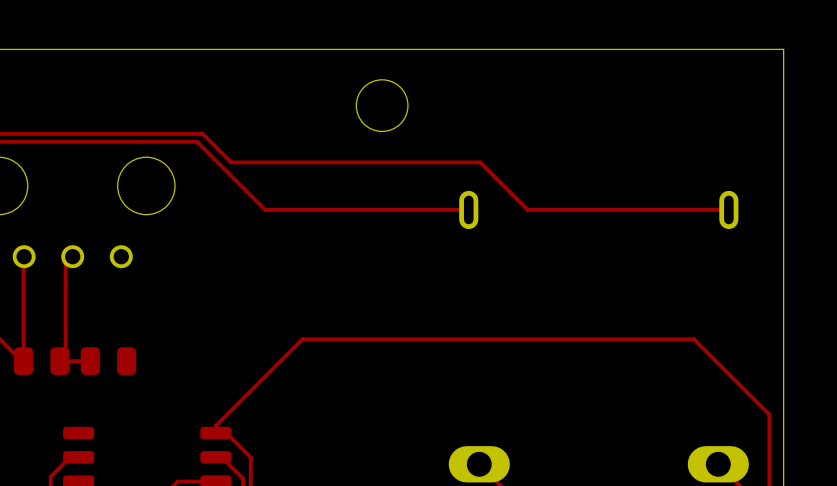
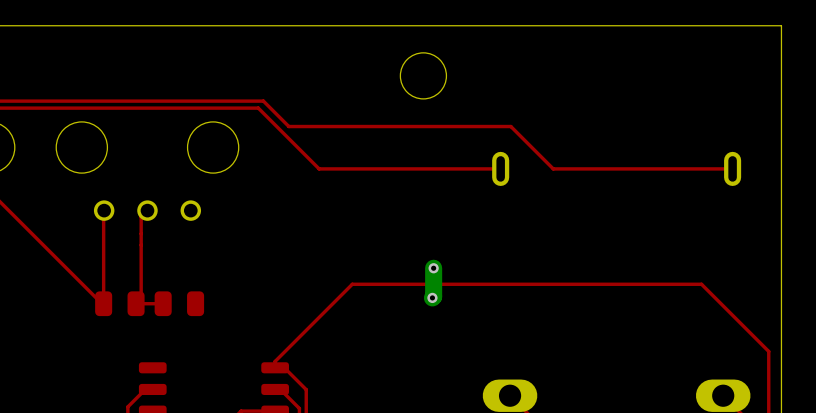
bottom track: none -> (433, 268) (432, 297)
via: none -> (433, 268)
via: none -> (432, 297)

